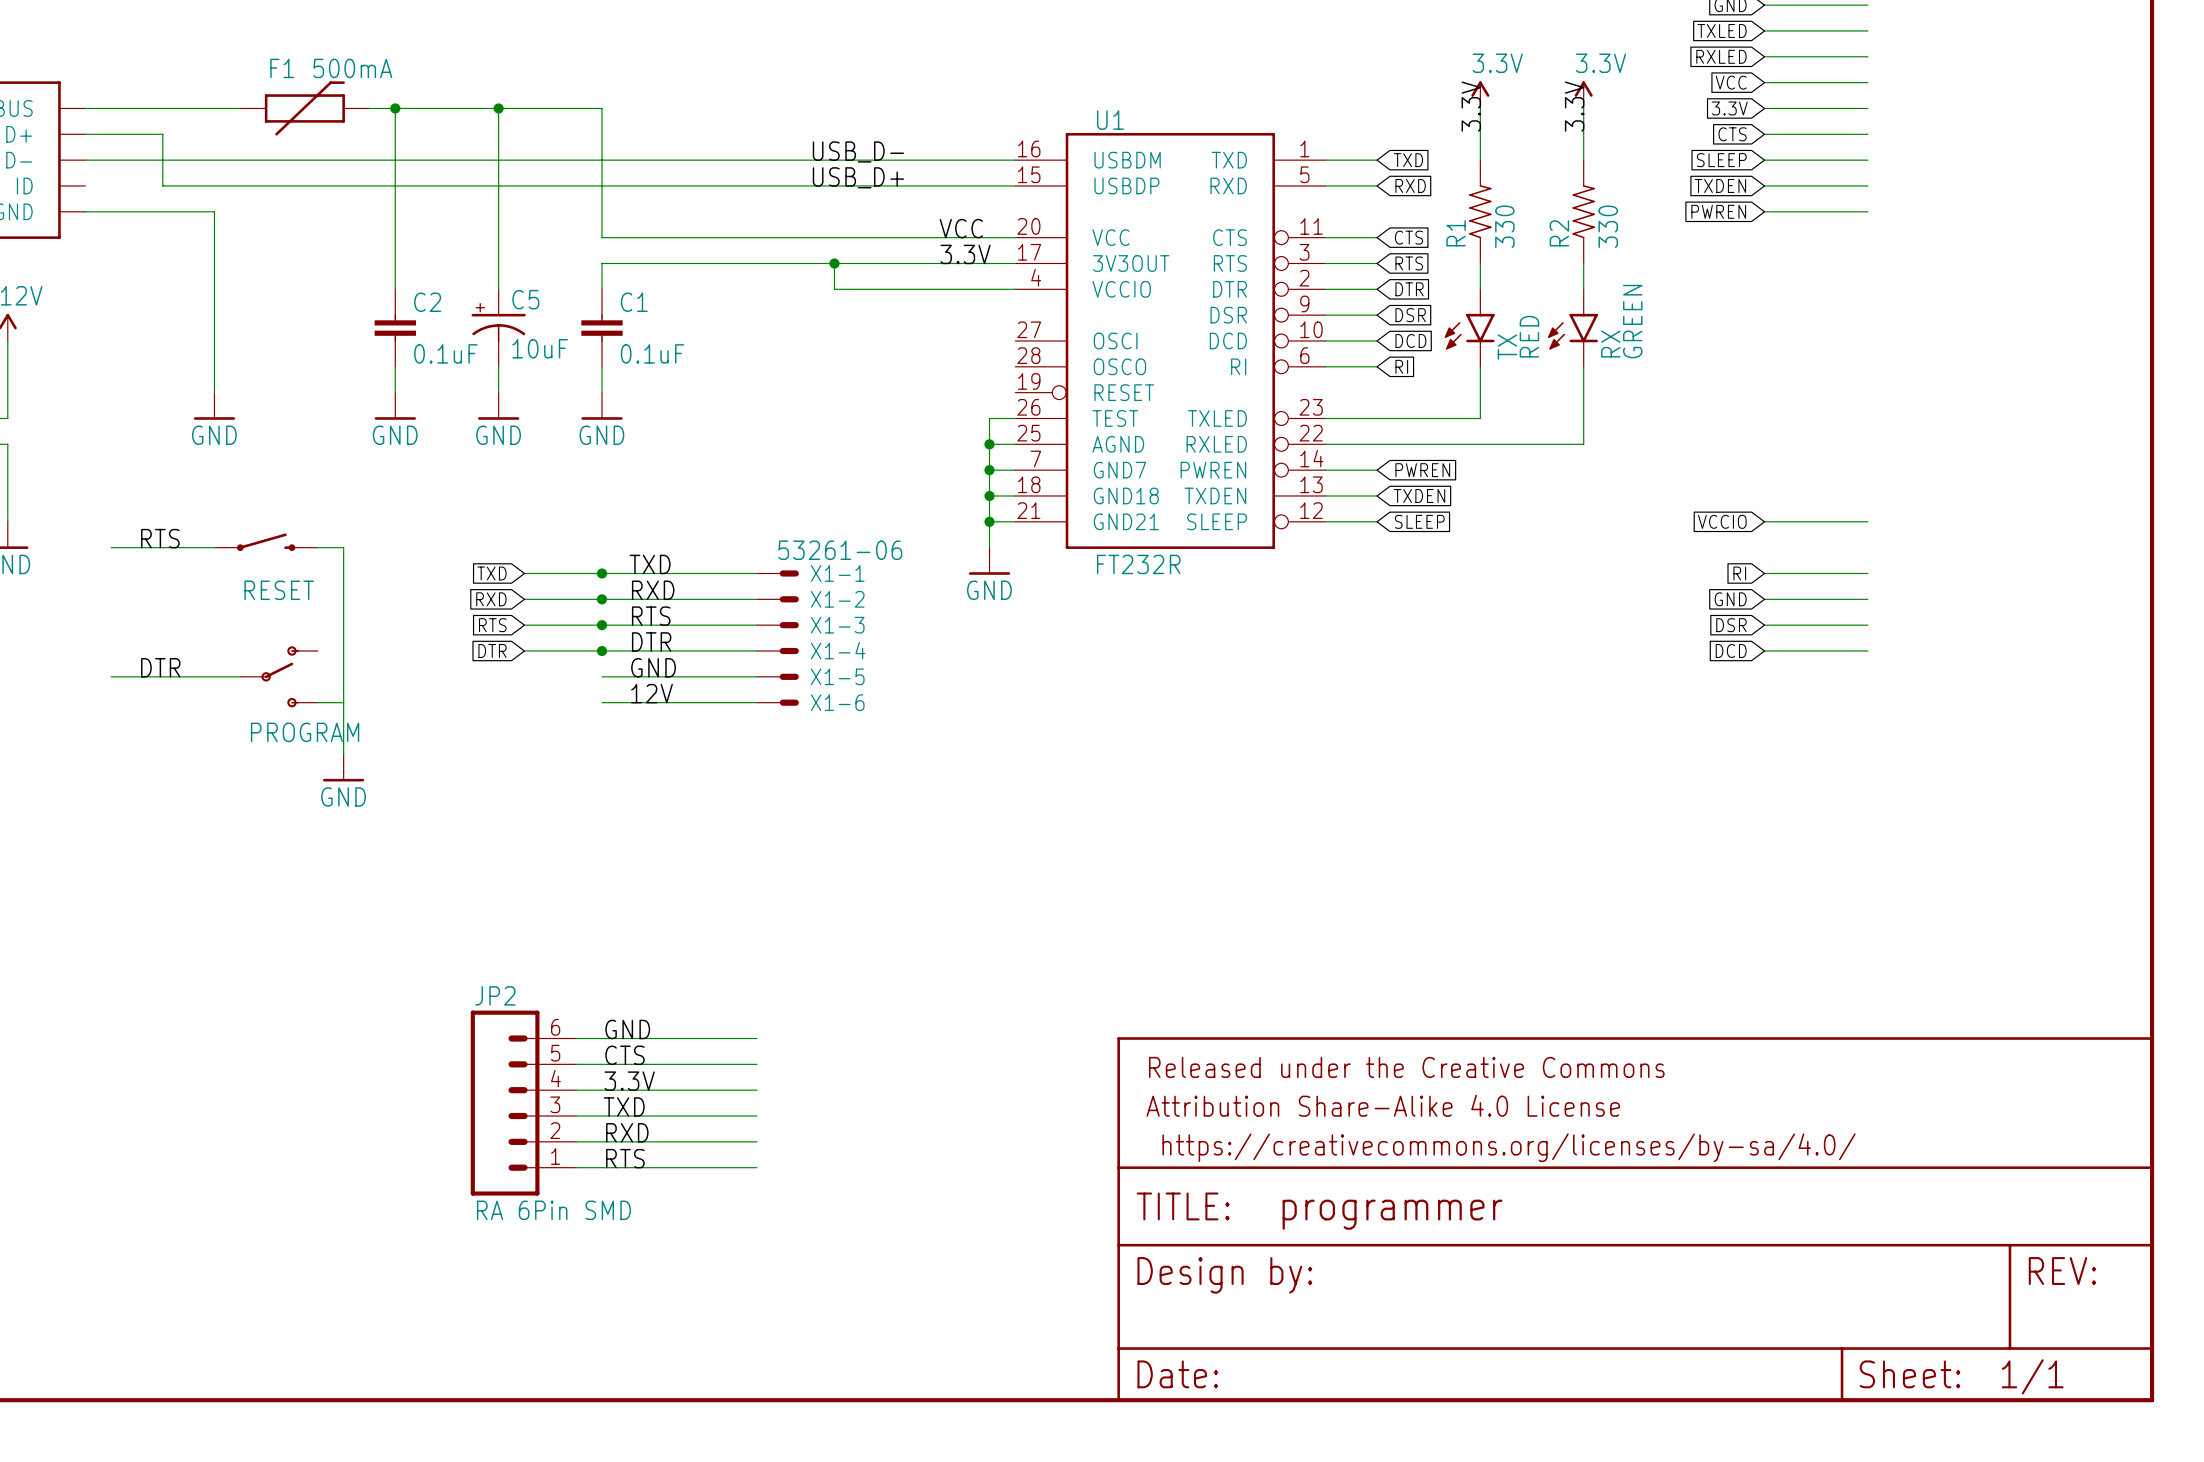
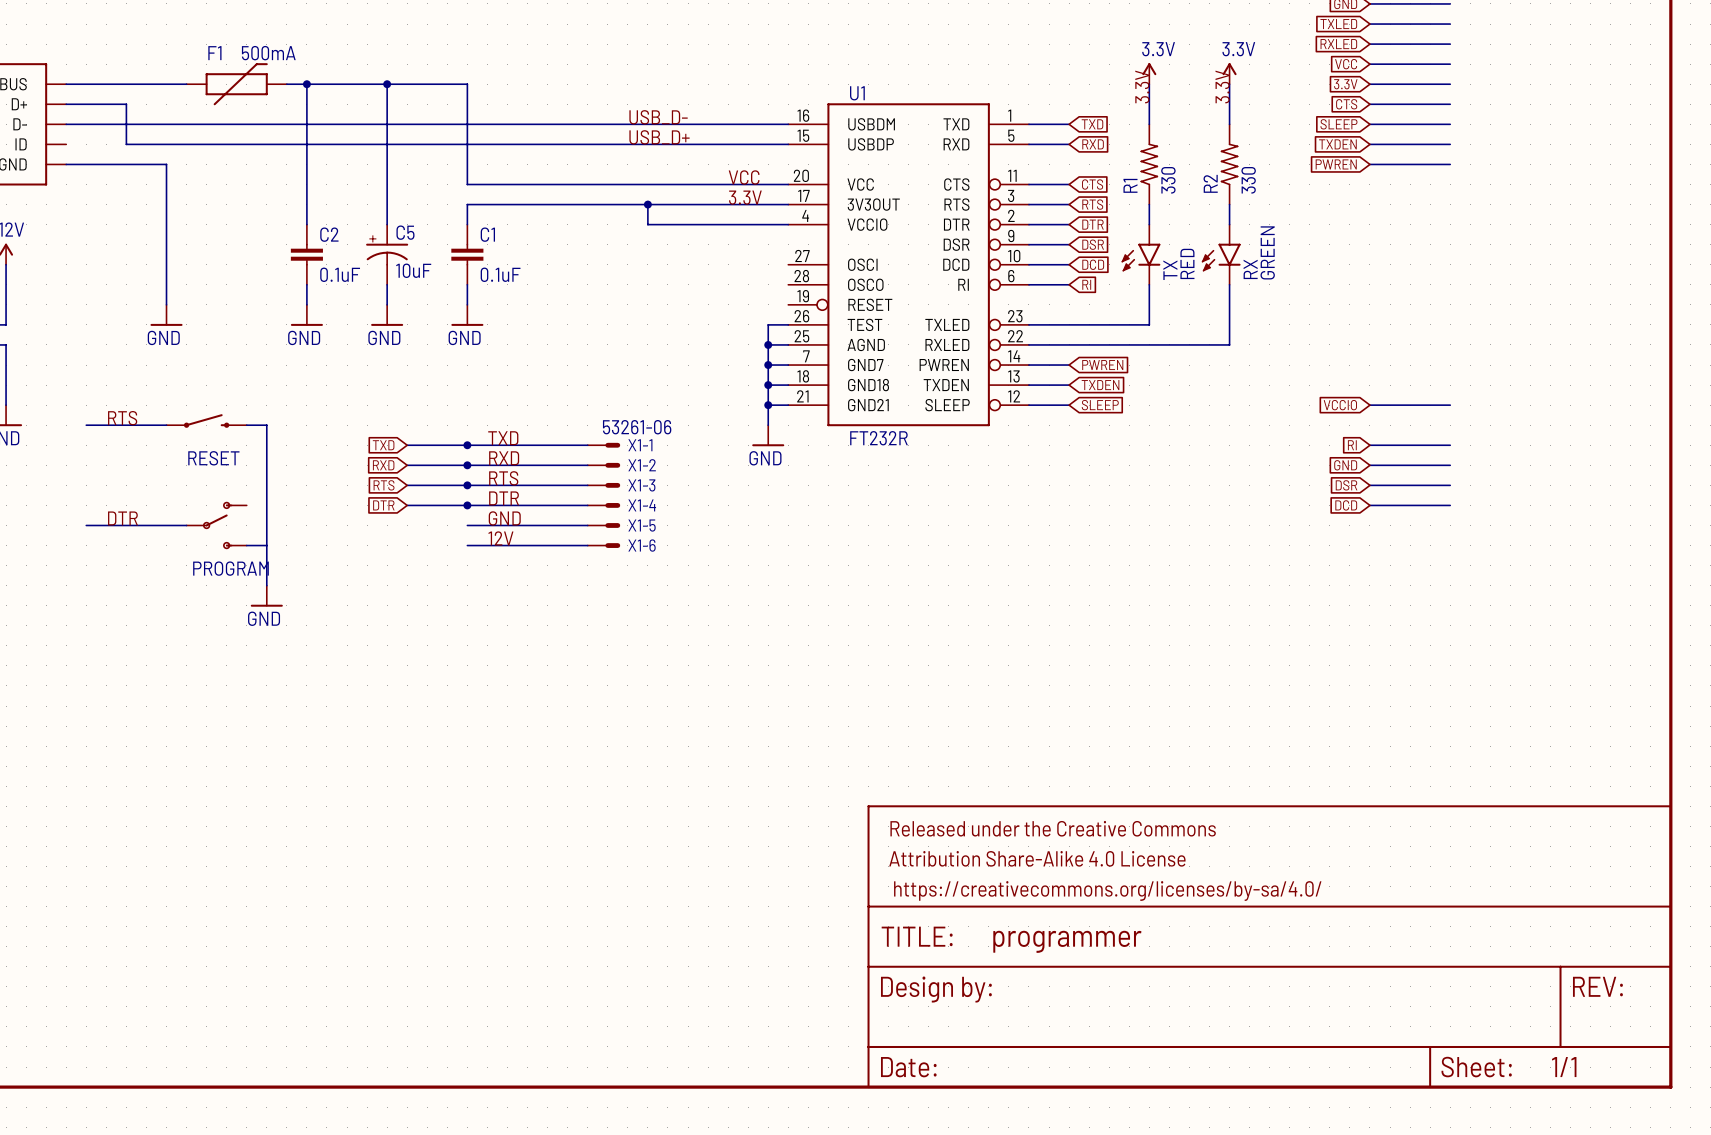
label: GND (627, 1029) -> none
wire: (576, 1038) (756, 1038) -> none
label: CTS (625, 1055) -> none
wire: (576, 1064) (756, 1064) -> none
label: 3.3V (629, 1081) -> none
wire: (576, 1090) (756, 1090) -> none
JP2: RA 6Pin SMD (523, 1103) -> none
label: TXD (624, 1106) -> none
wire: (576, 1116) (756, 1116) -> none
label: RXD (627, 1132) -> none
wire: (576, 1141) (756, 1141) -> none
label: RTS (625, 1158) -> none
wire: (576, 1167) (756, 1167) -> none

